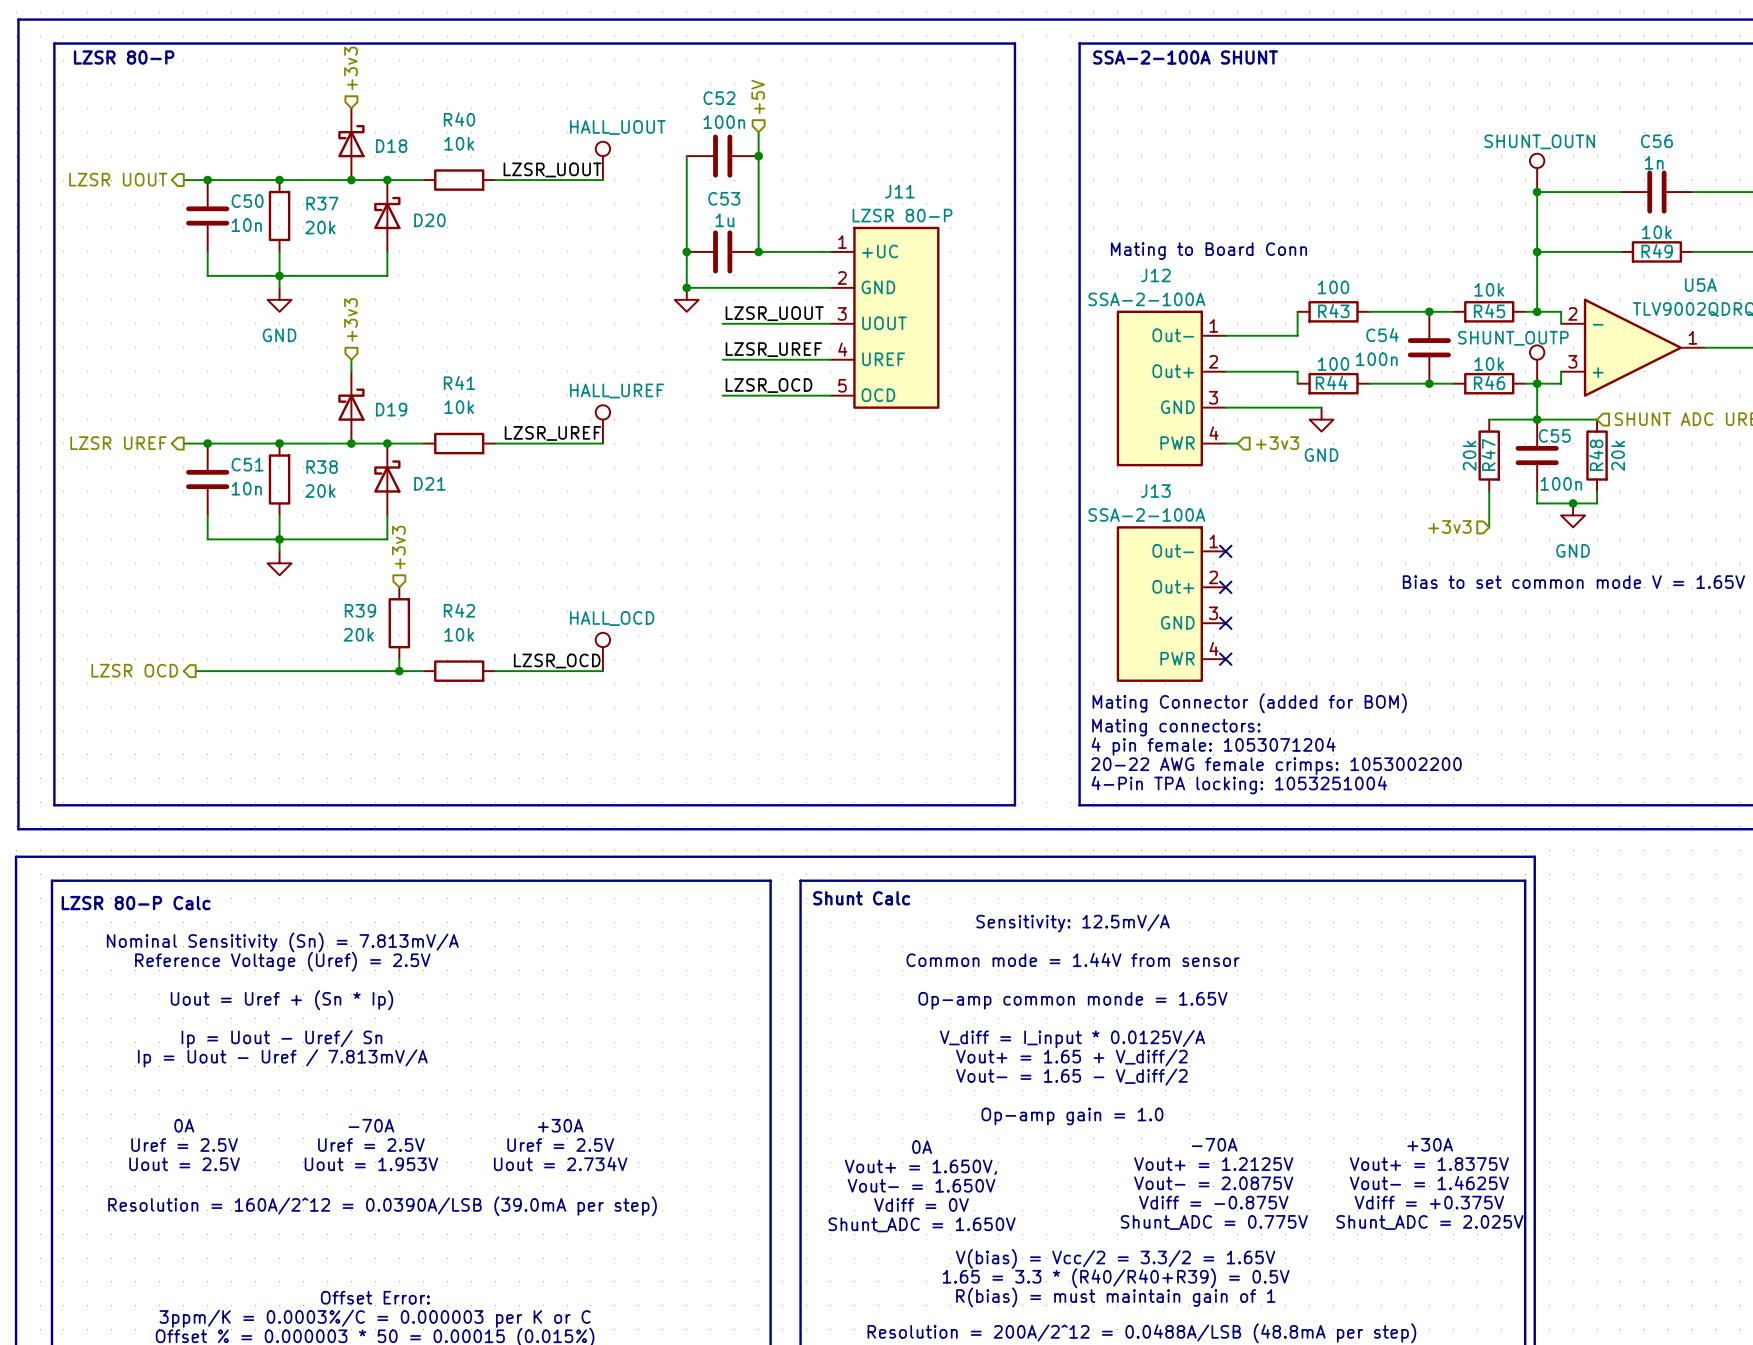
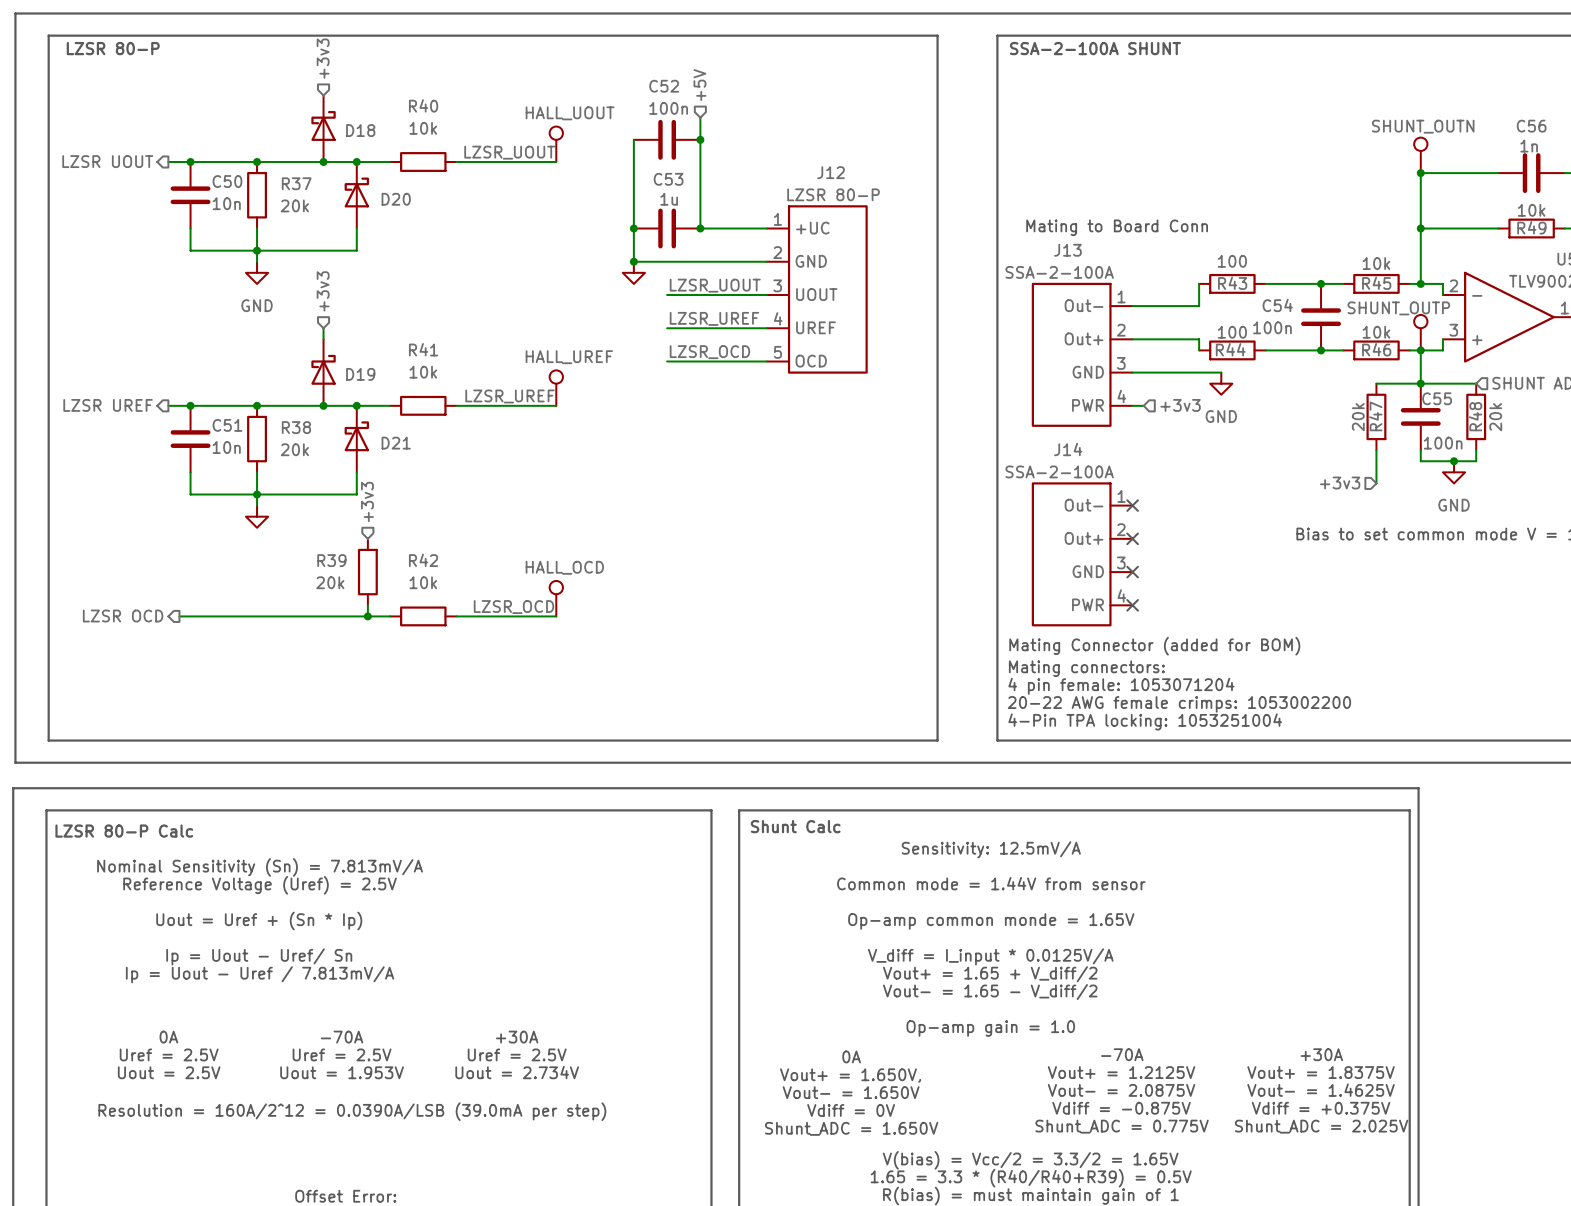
J11 name: J11 (899, 191) -> J12 (831, 172)
J12 name: J12 (1155, 275) -> J13 (1067, 250)
J13 name: J13 (1155, 491) -> J14 (1068, 449)

